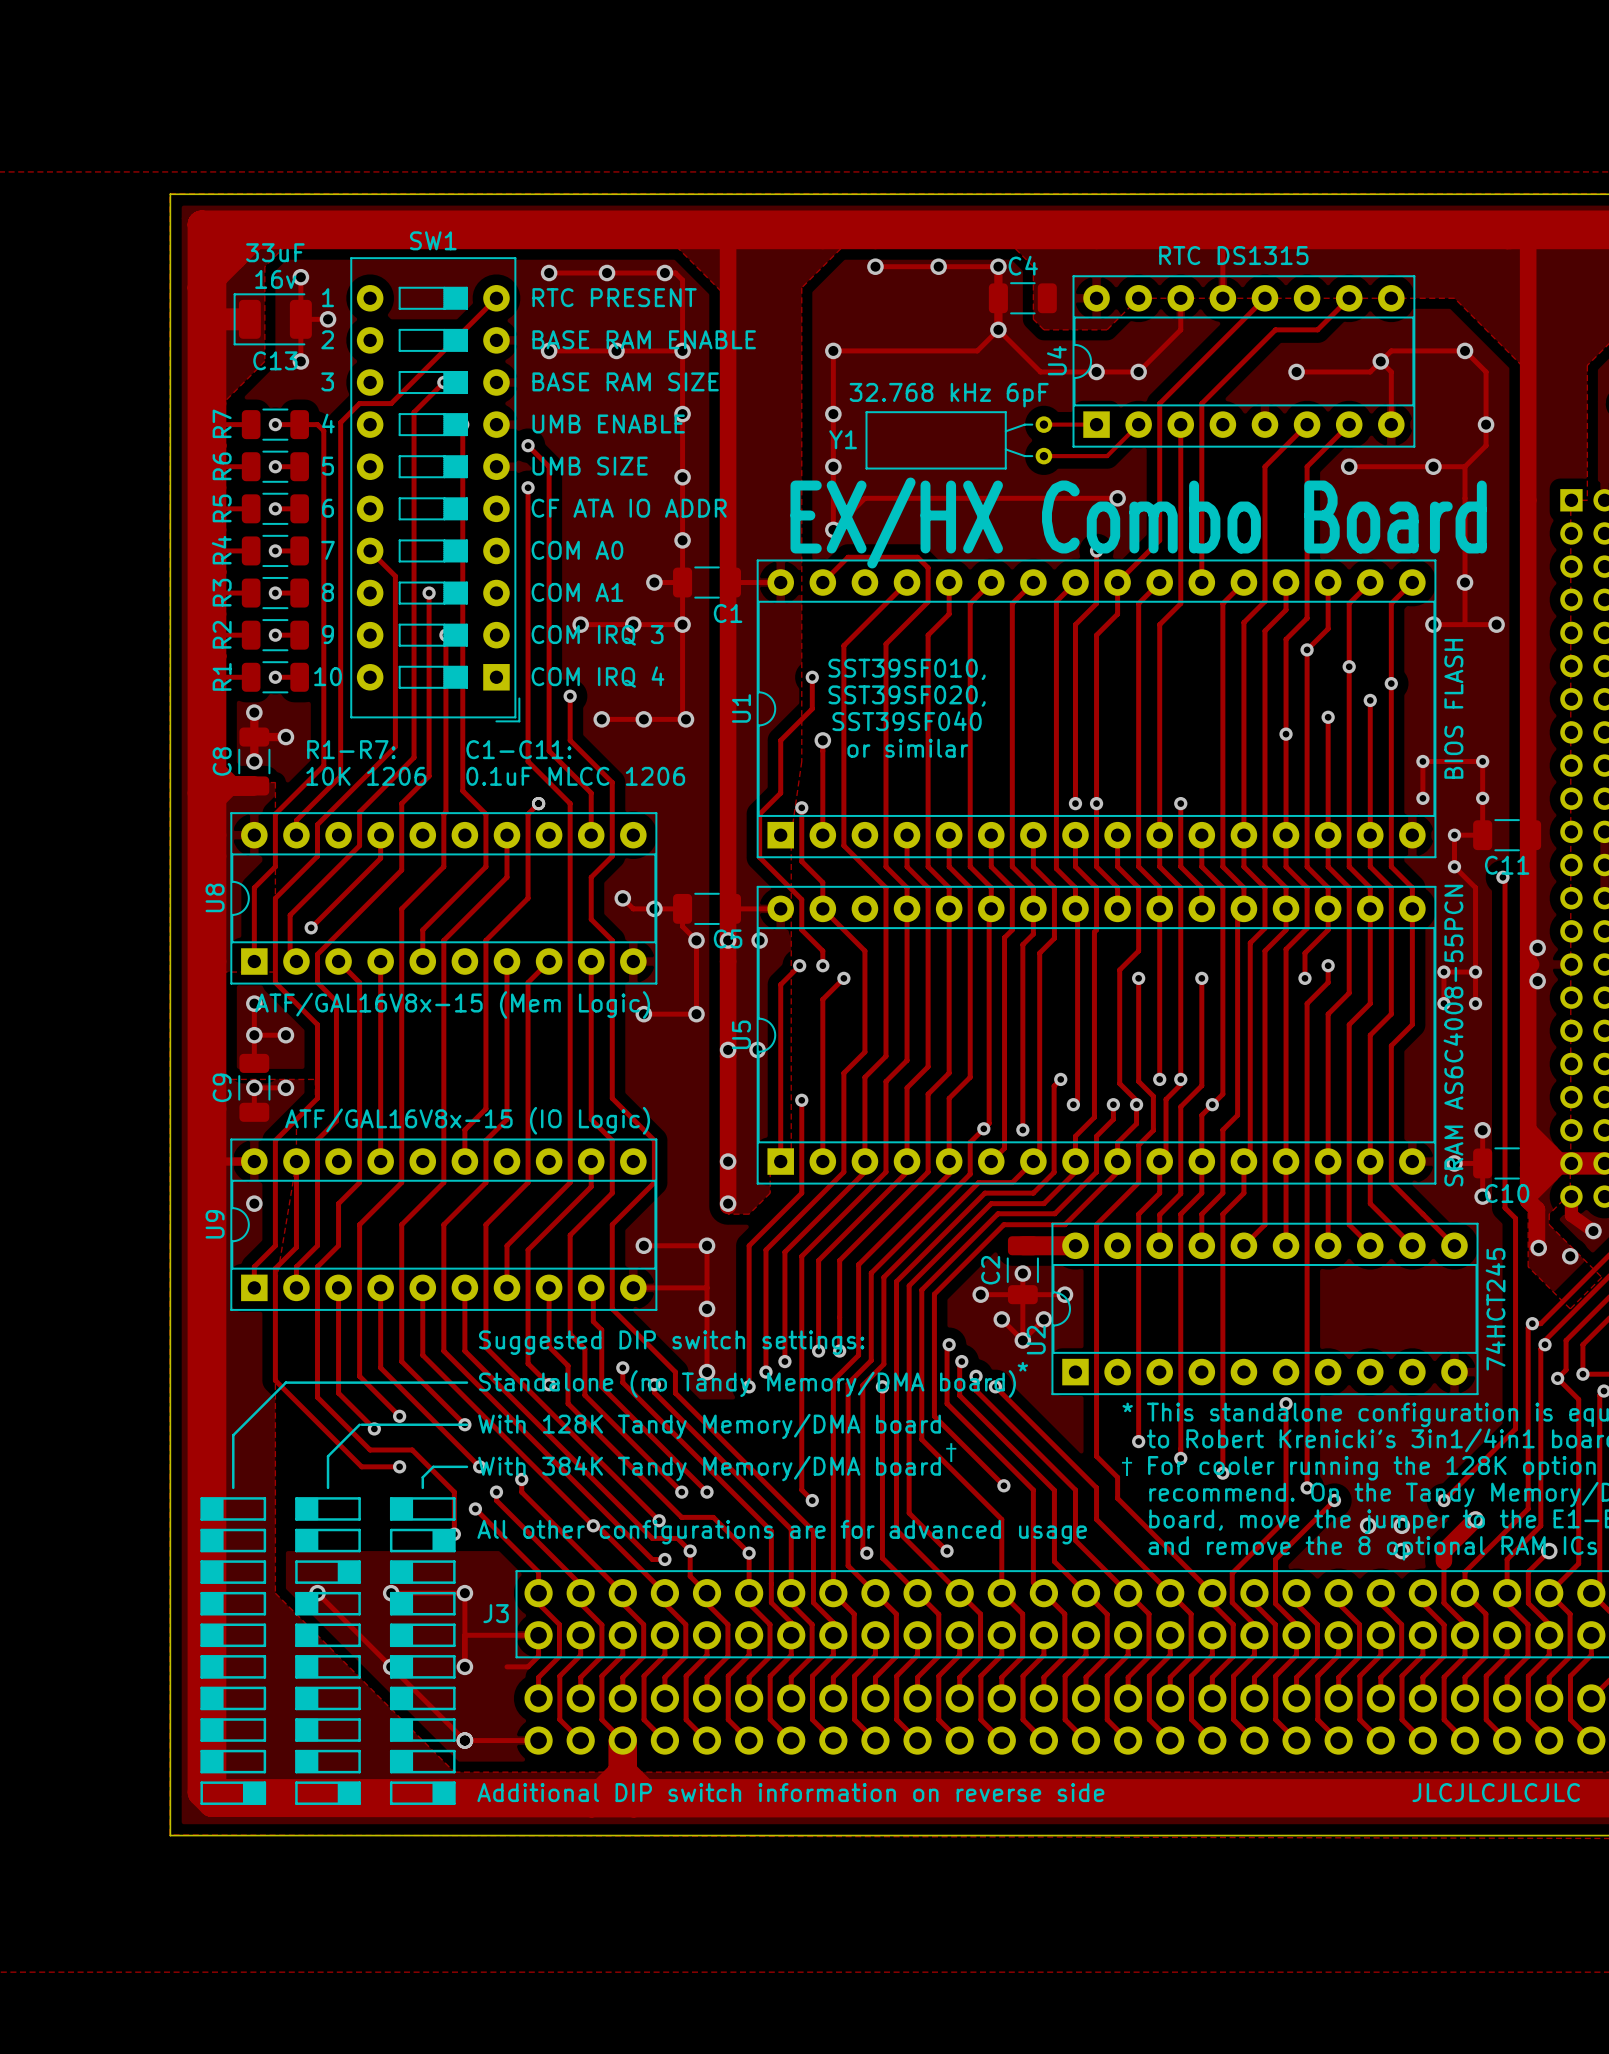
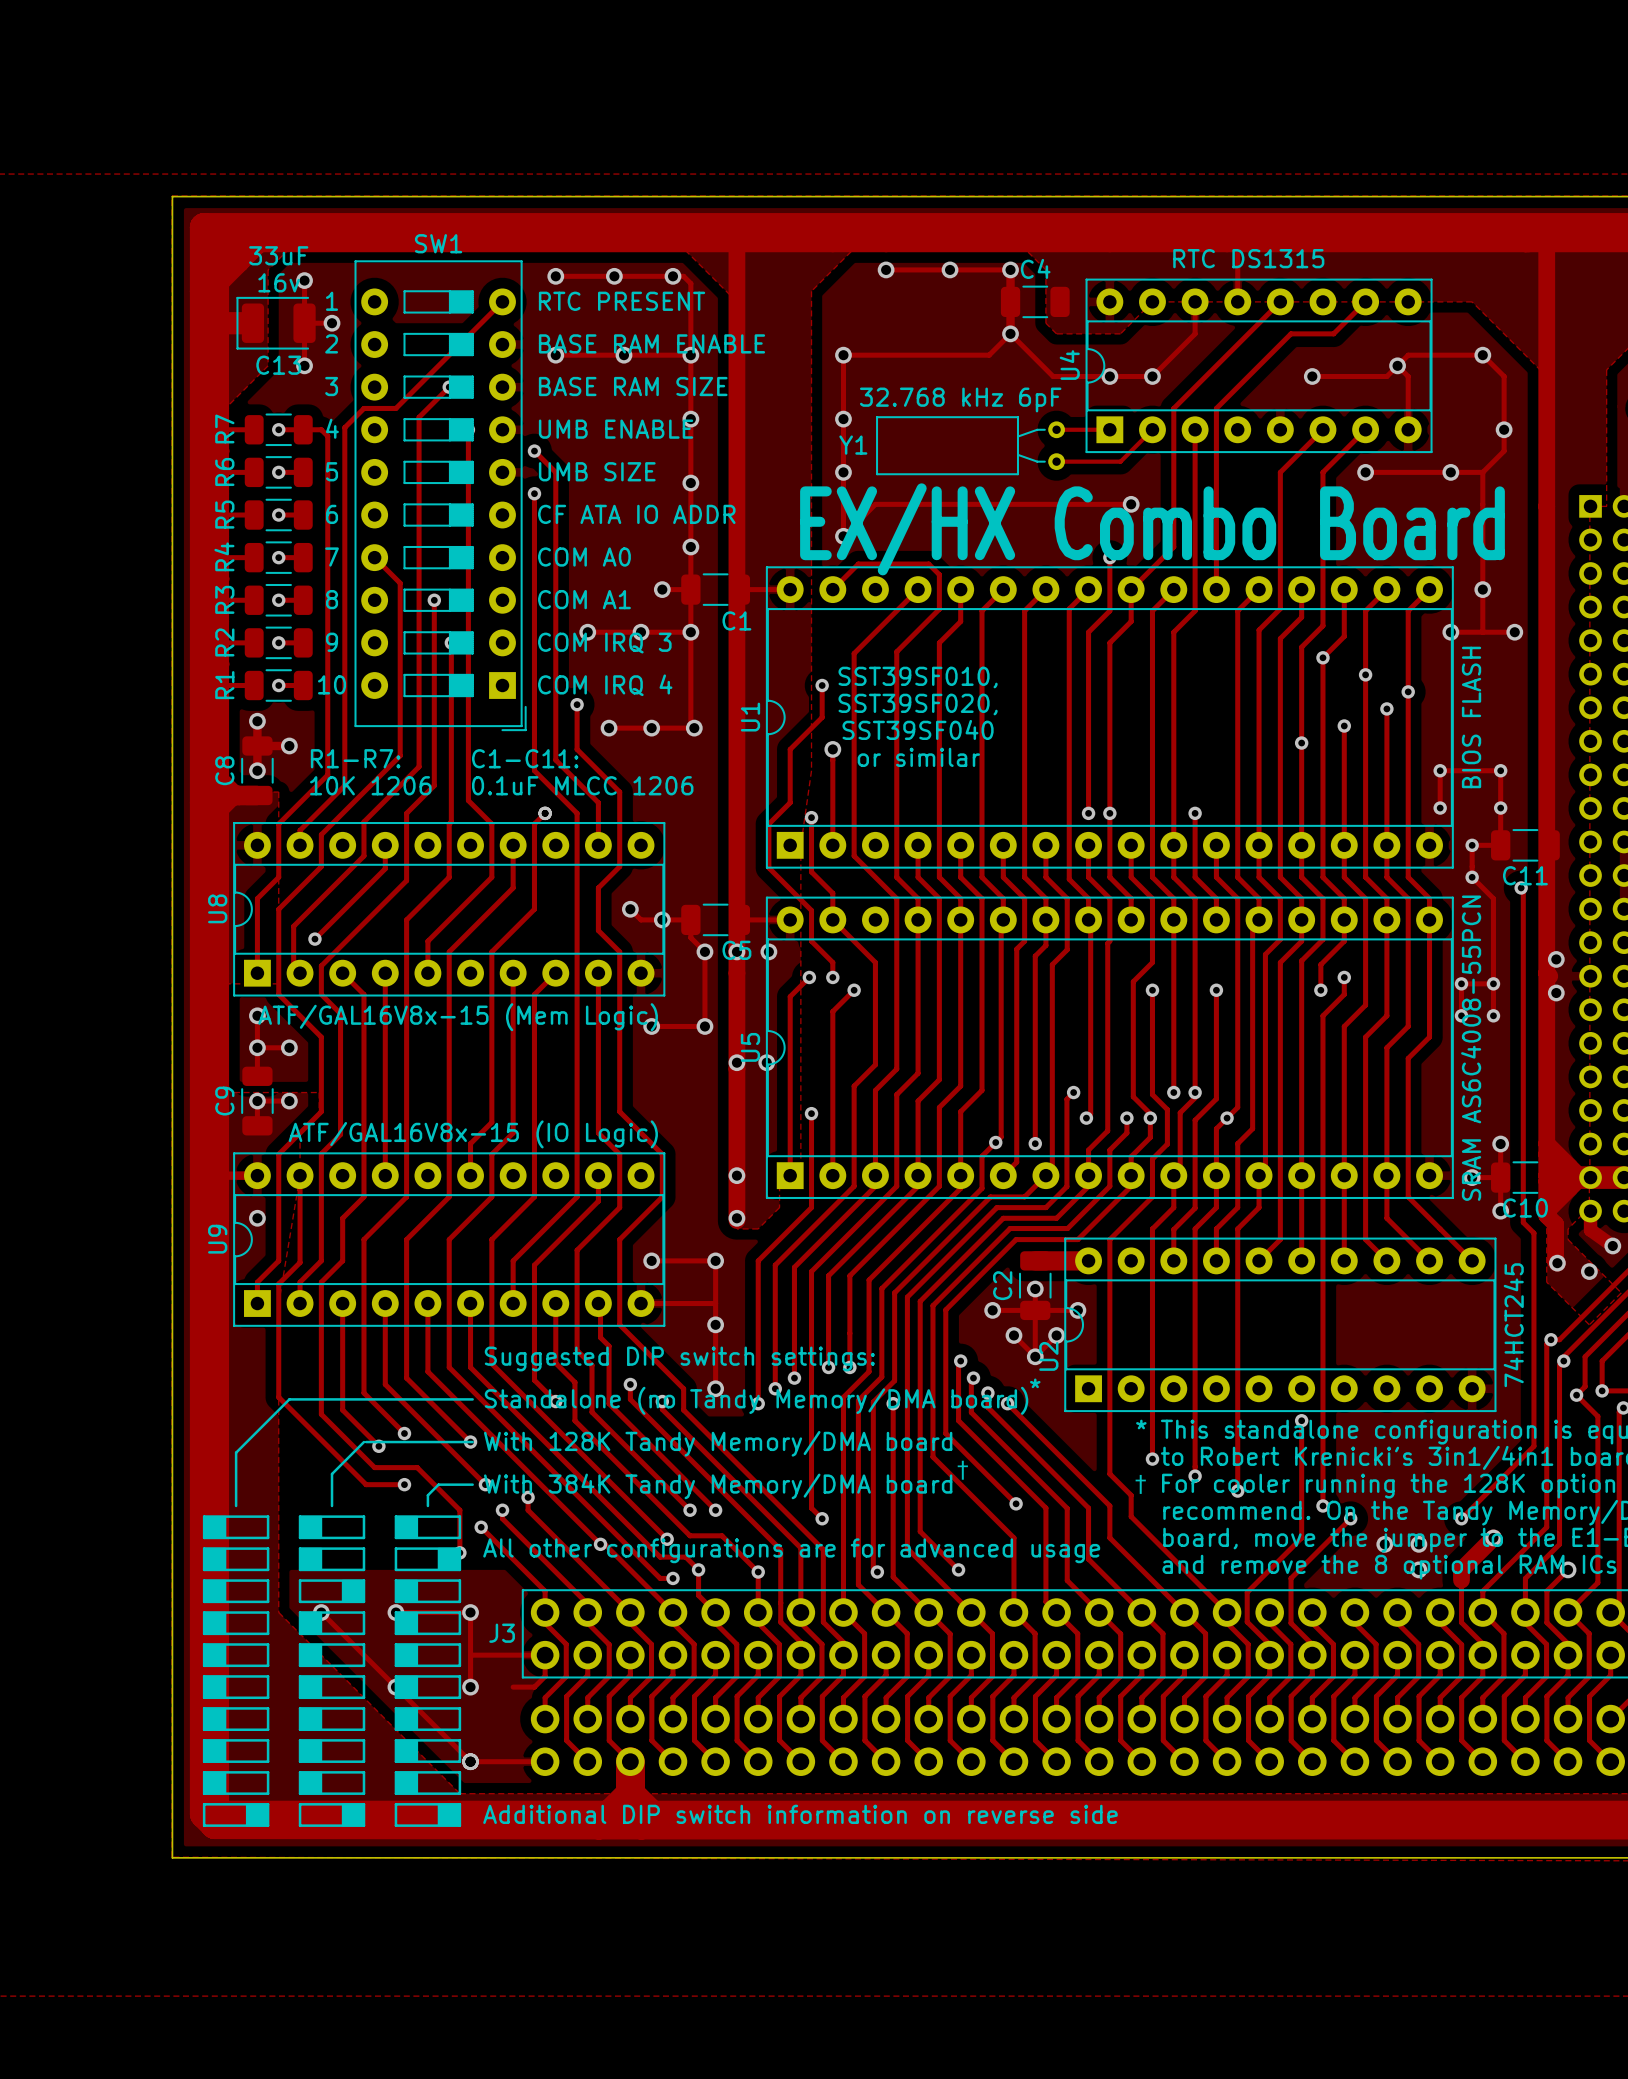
text: JLCJLCJLCJLC (1496, 1792) -> none

